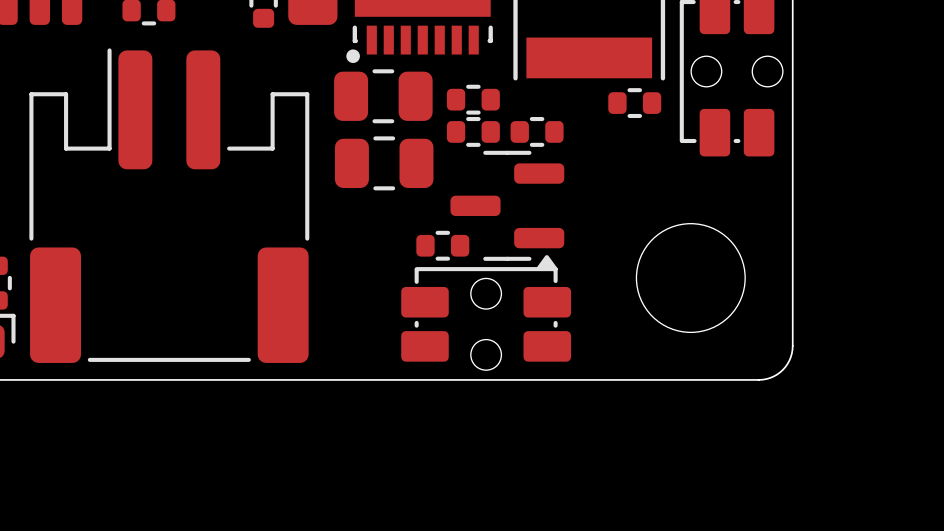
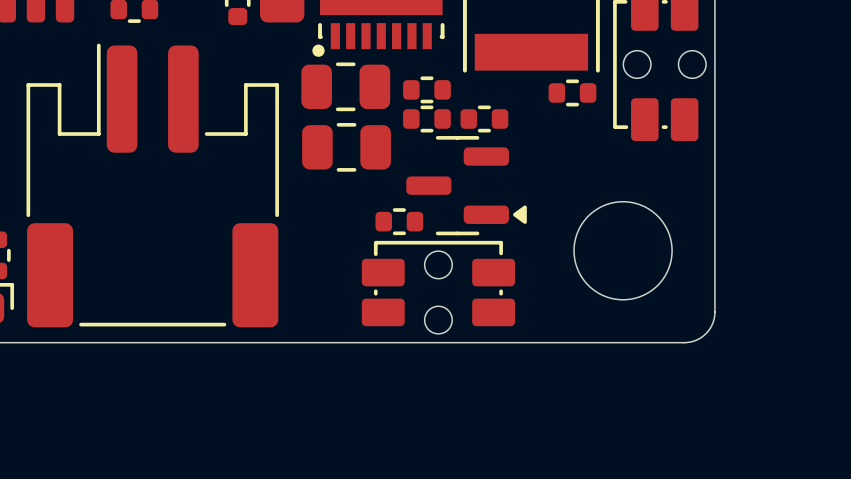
part footprint: [450, 150, 565, 271] -> [406, 136, 527, 236]

